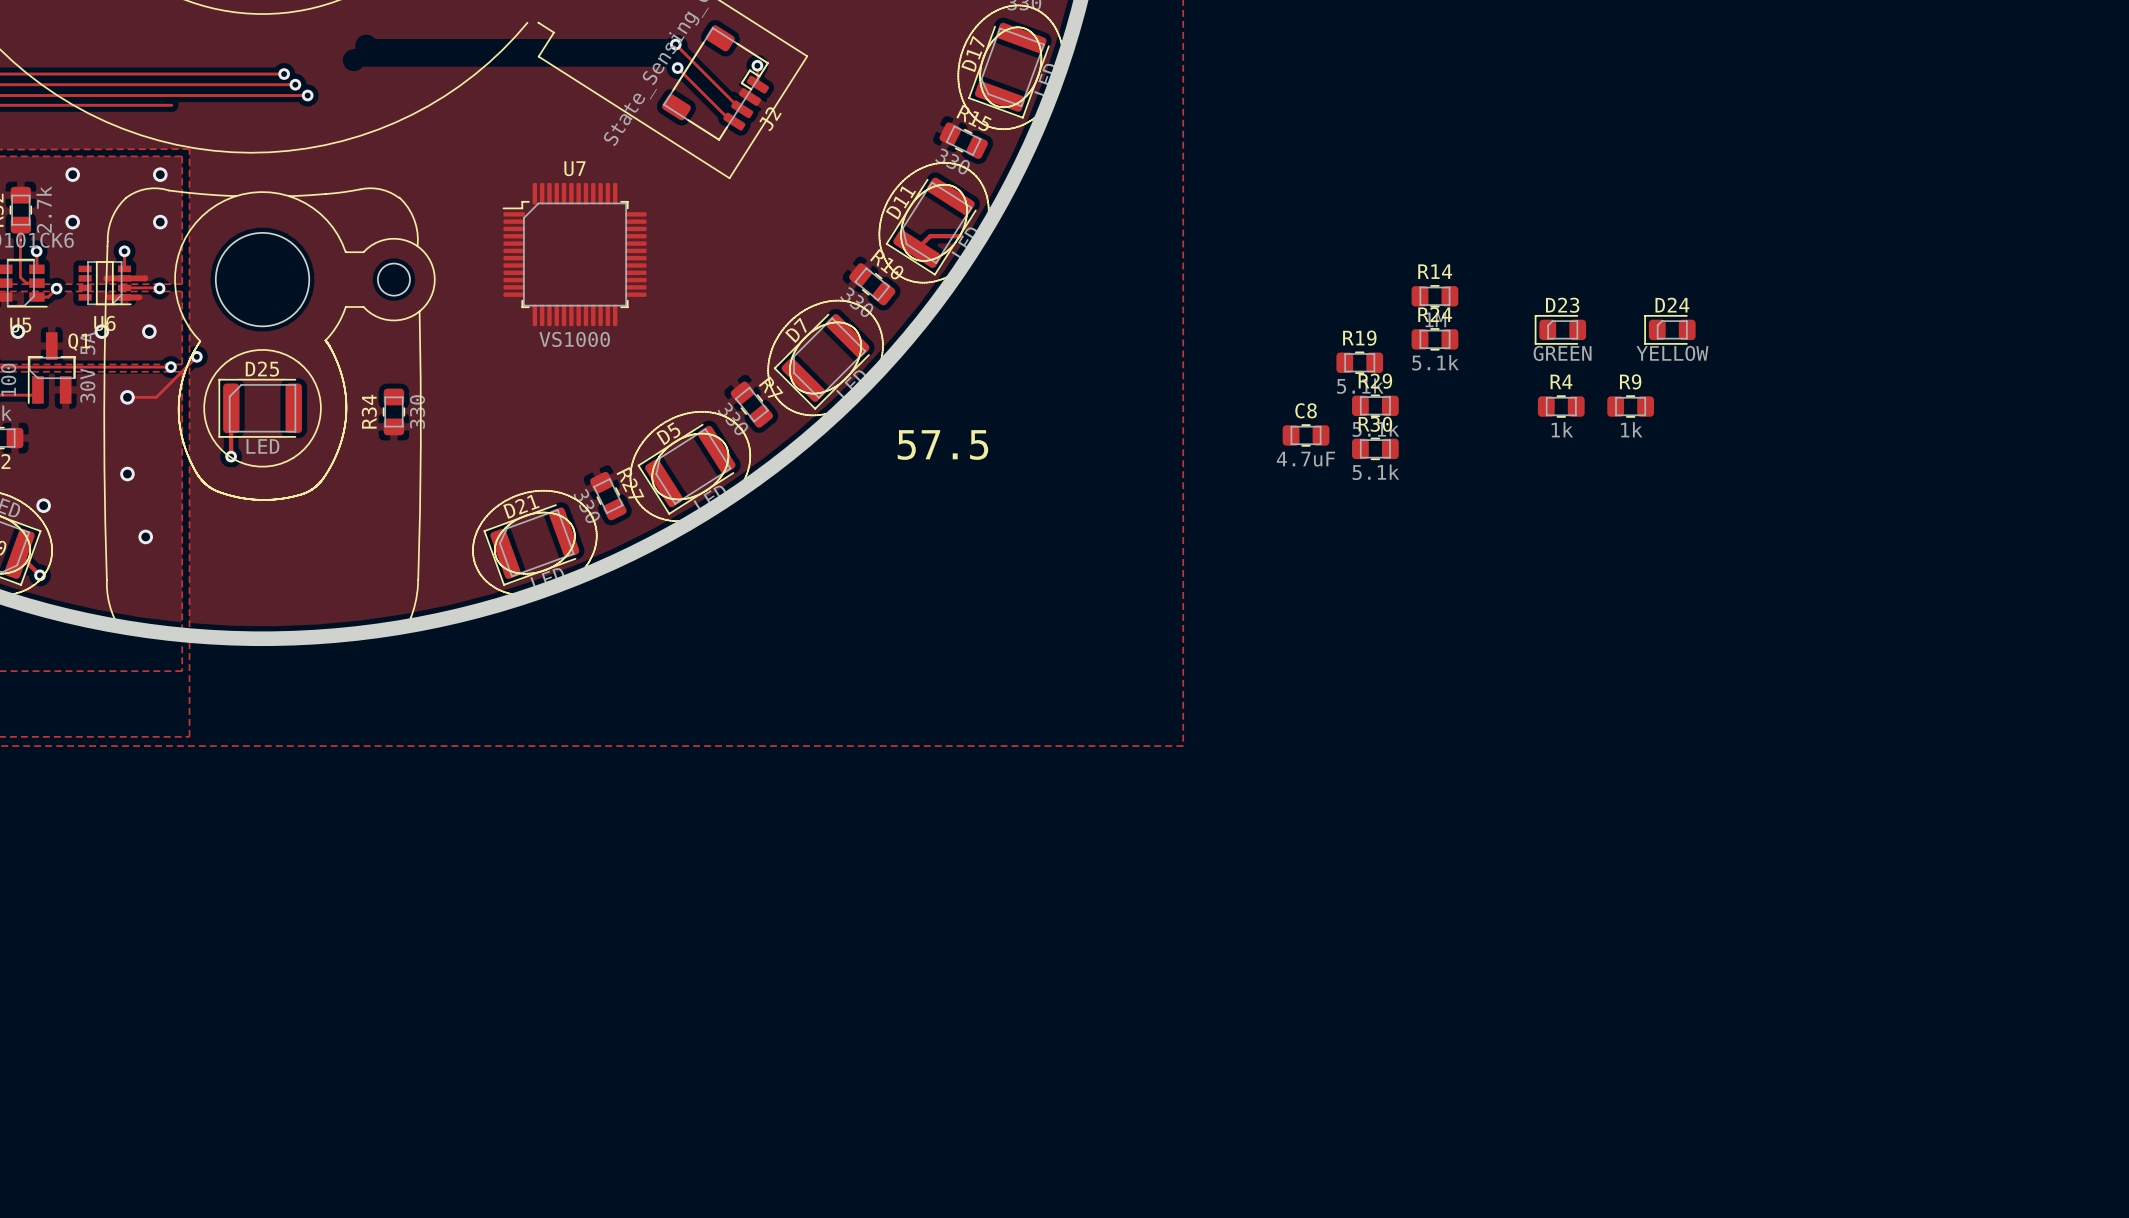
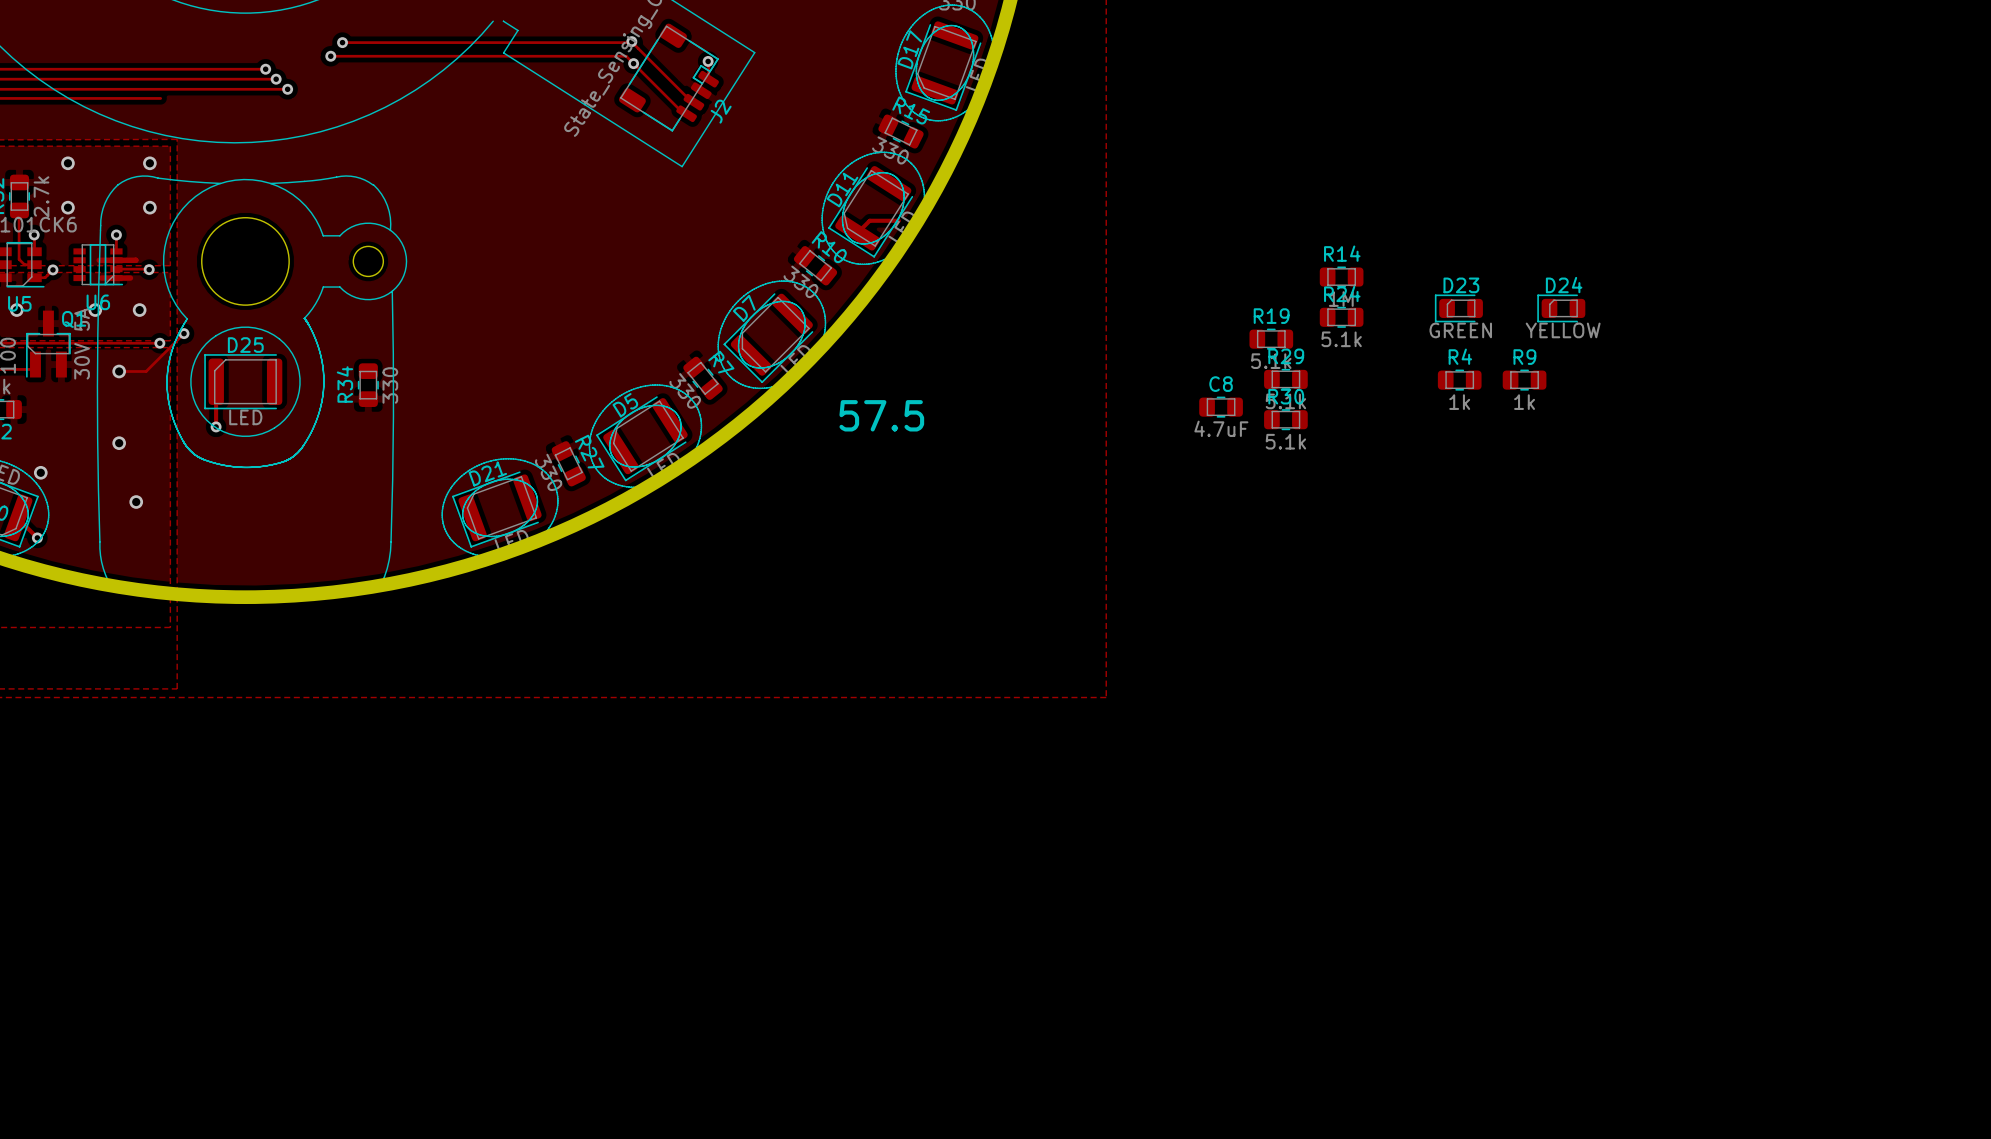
via: none -> (342, 42)
track: (676, 45) (741, 110) -> (342, 42) (632, 42) (692, 103)
track: none -> (330, 56) (626, 56) (633, 63)
via: none -> (330, 56)
U7: VS1000 (574, 254) -> none

